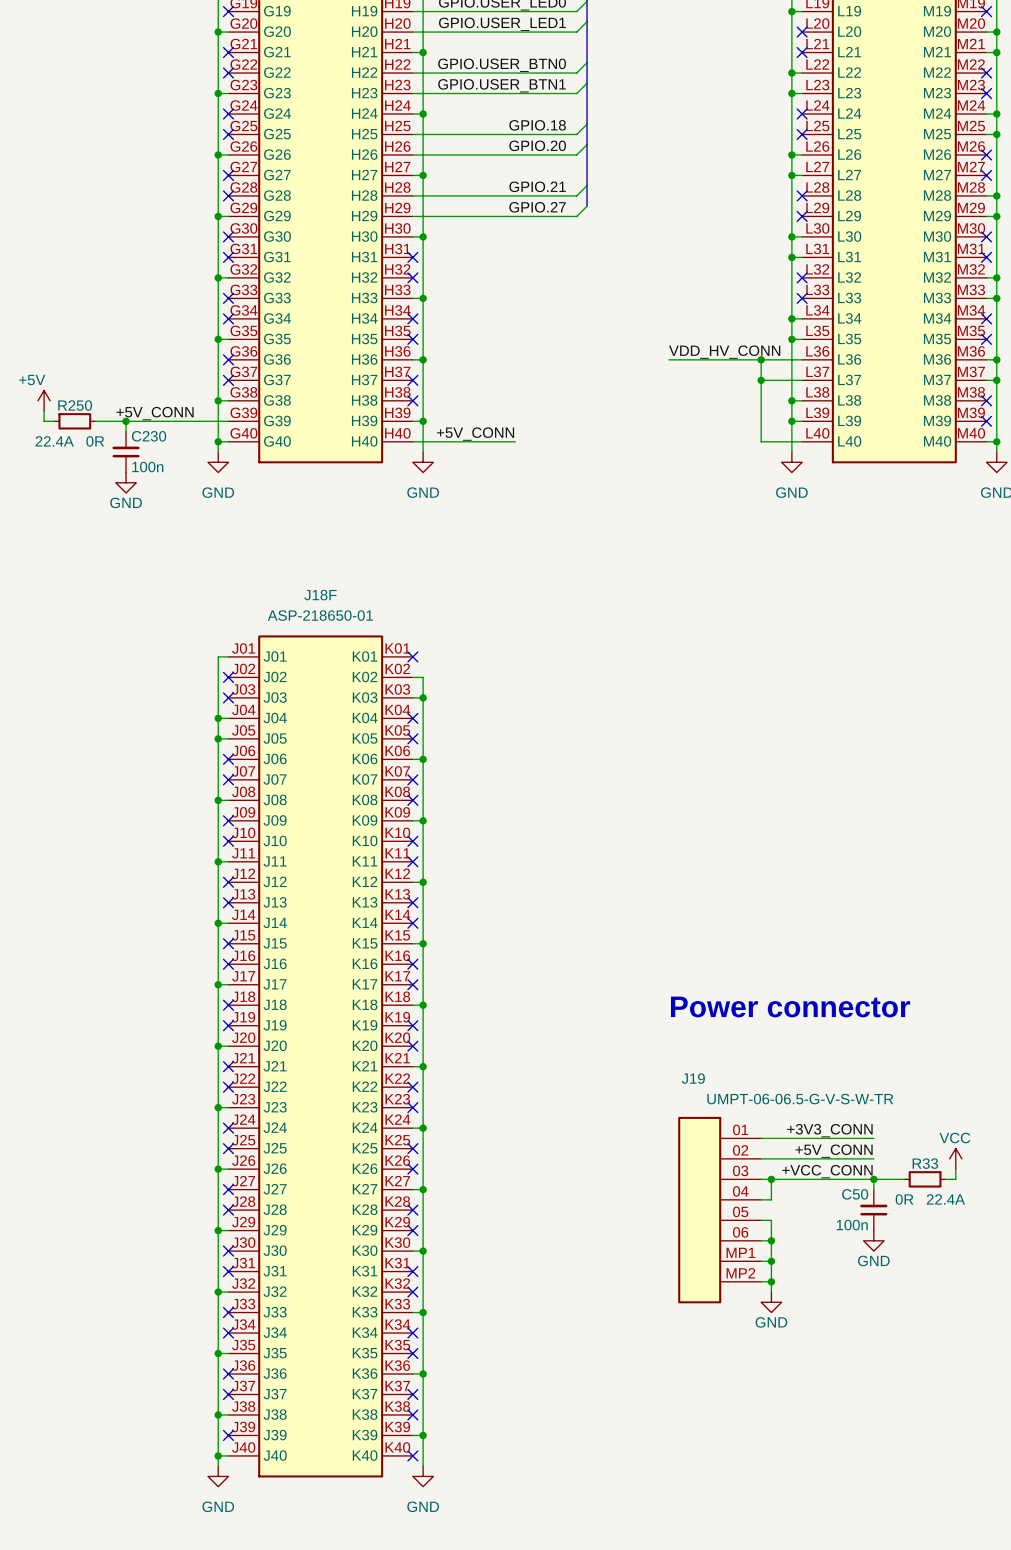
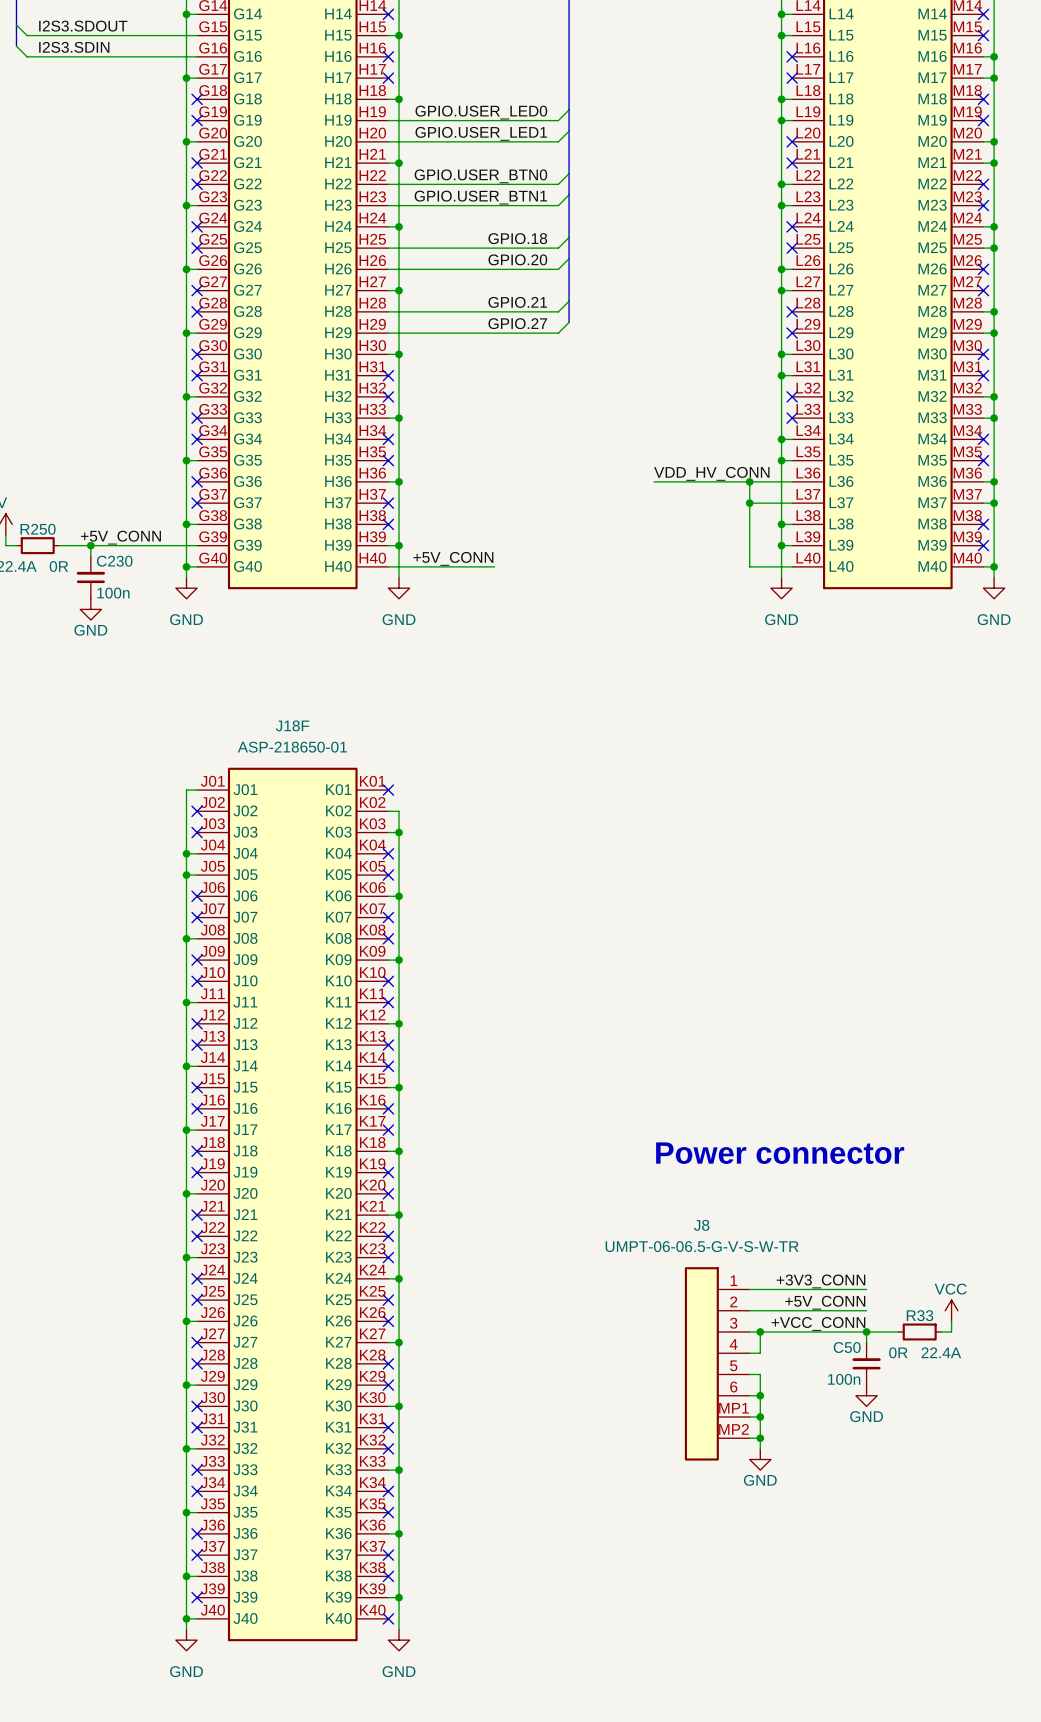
J19: (719, 1210) -> none
J8: none -> (717, 1363)

